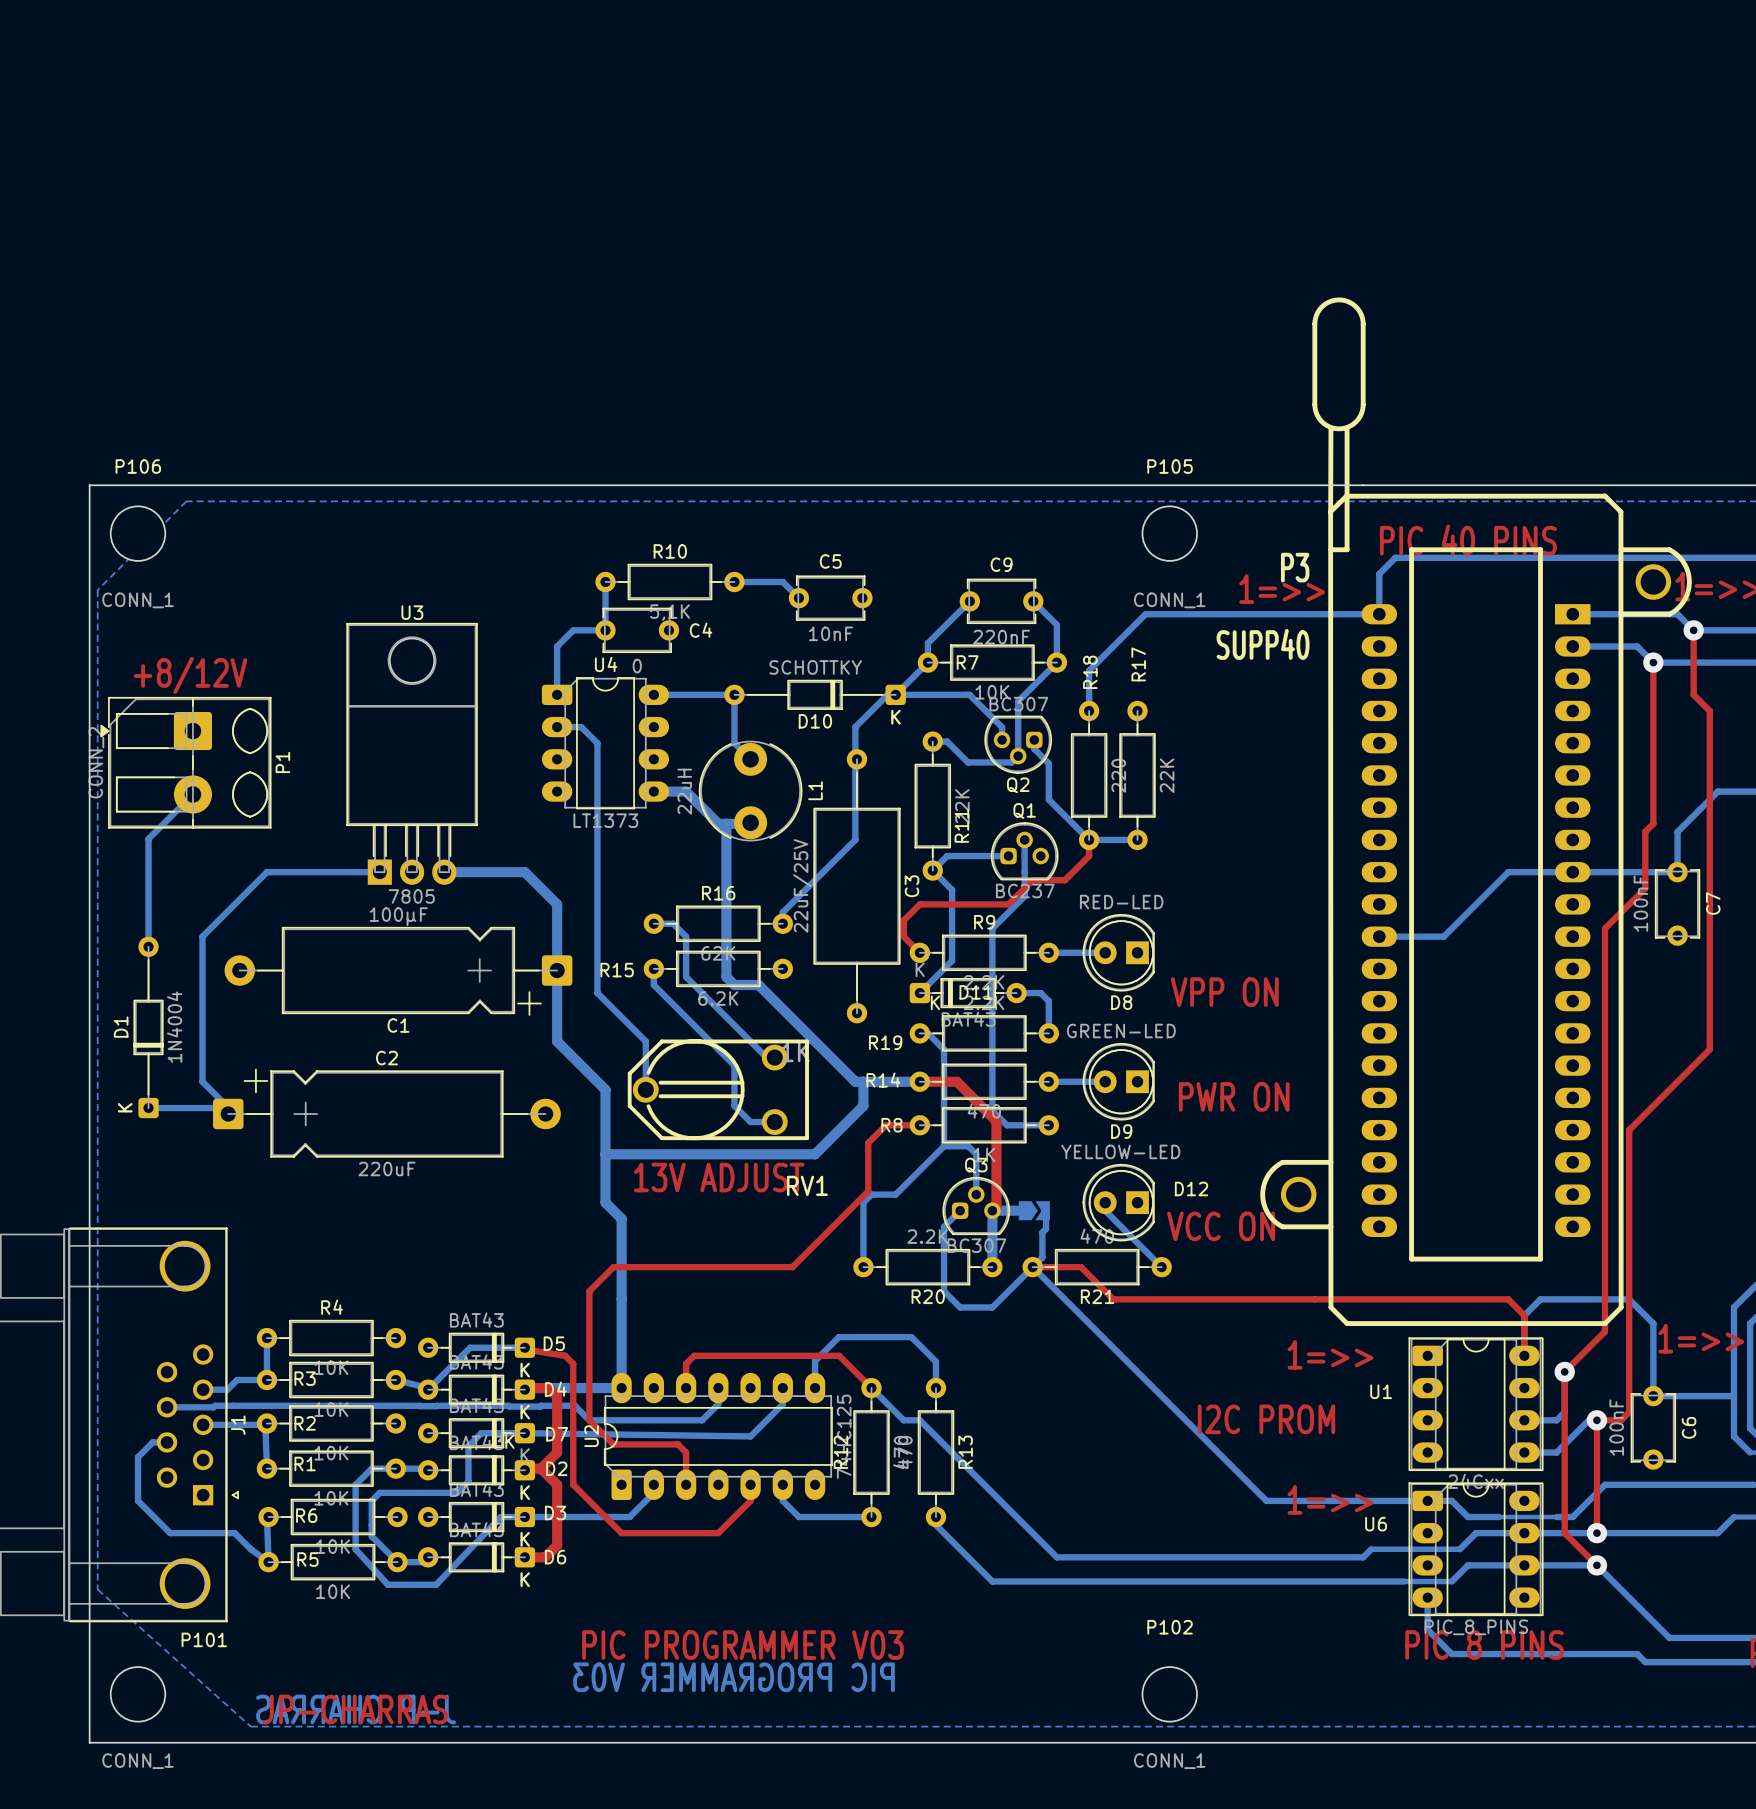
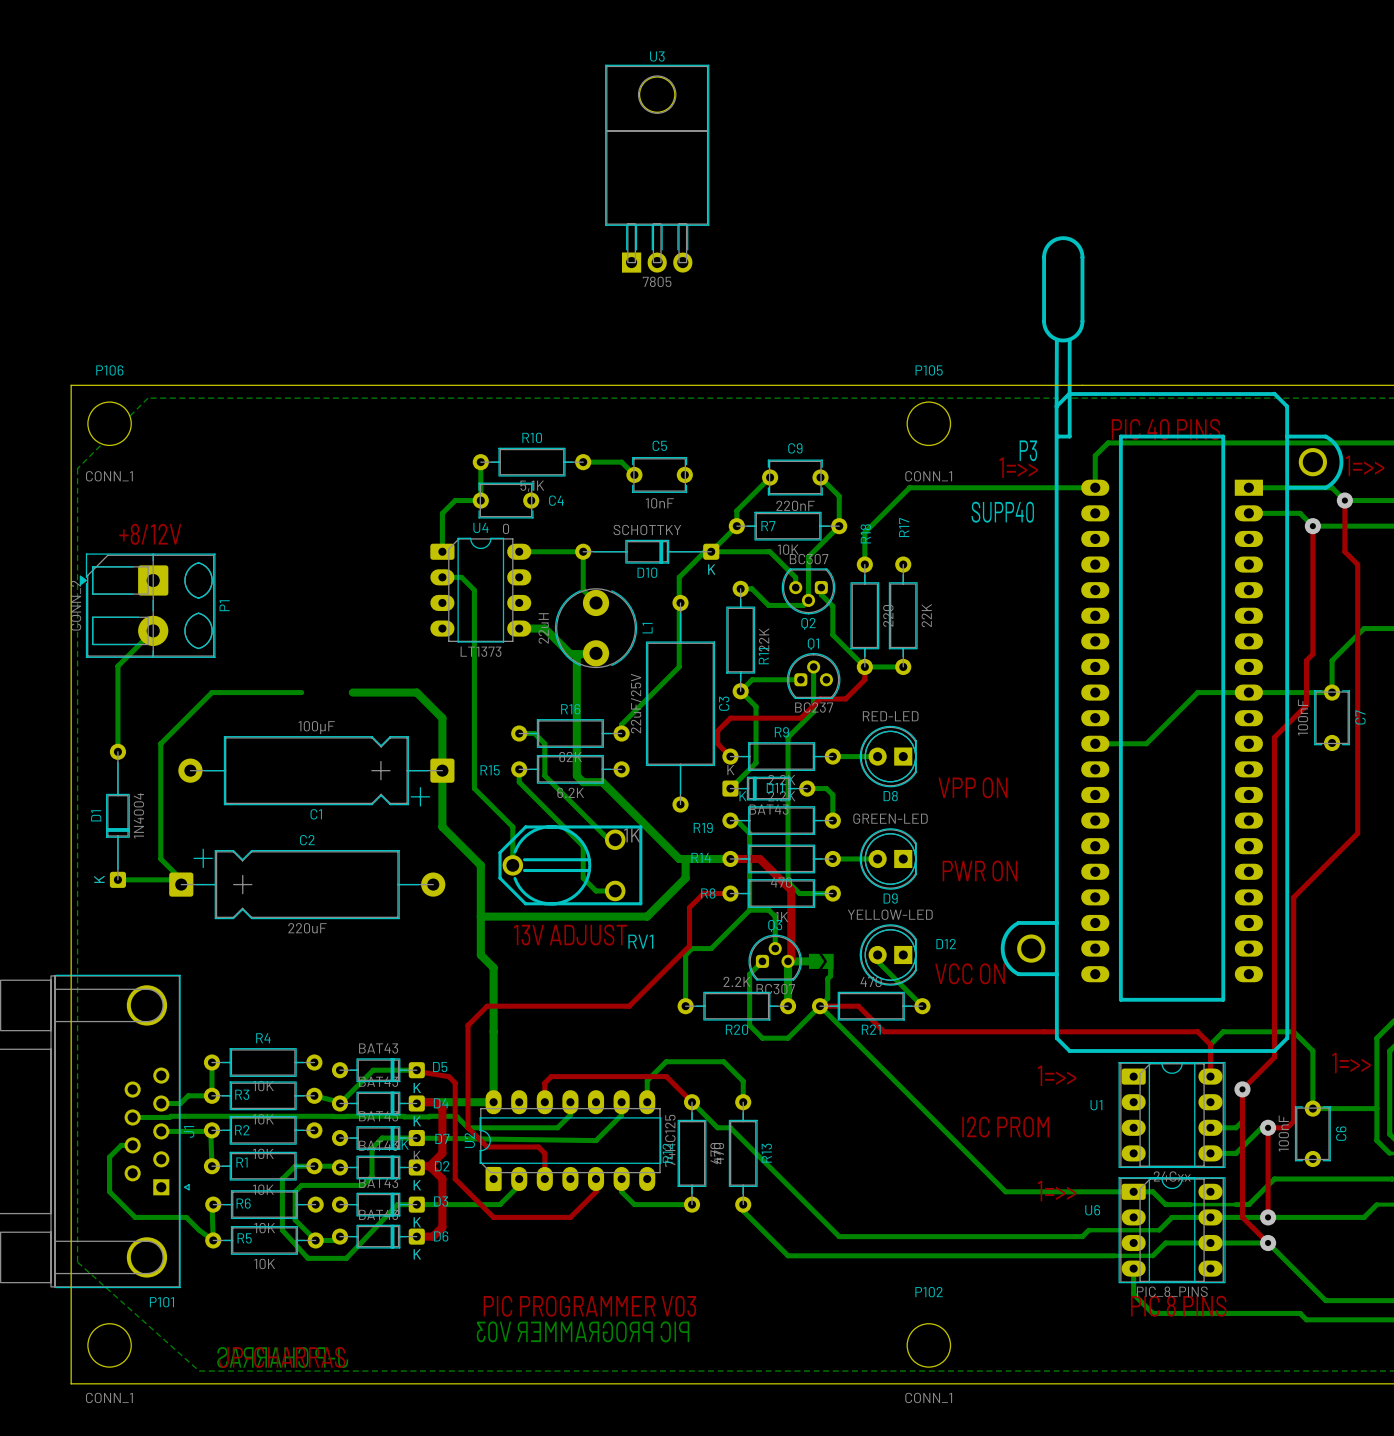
U3 position: (412, 753) -> (657, 168)

